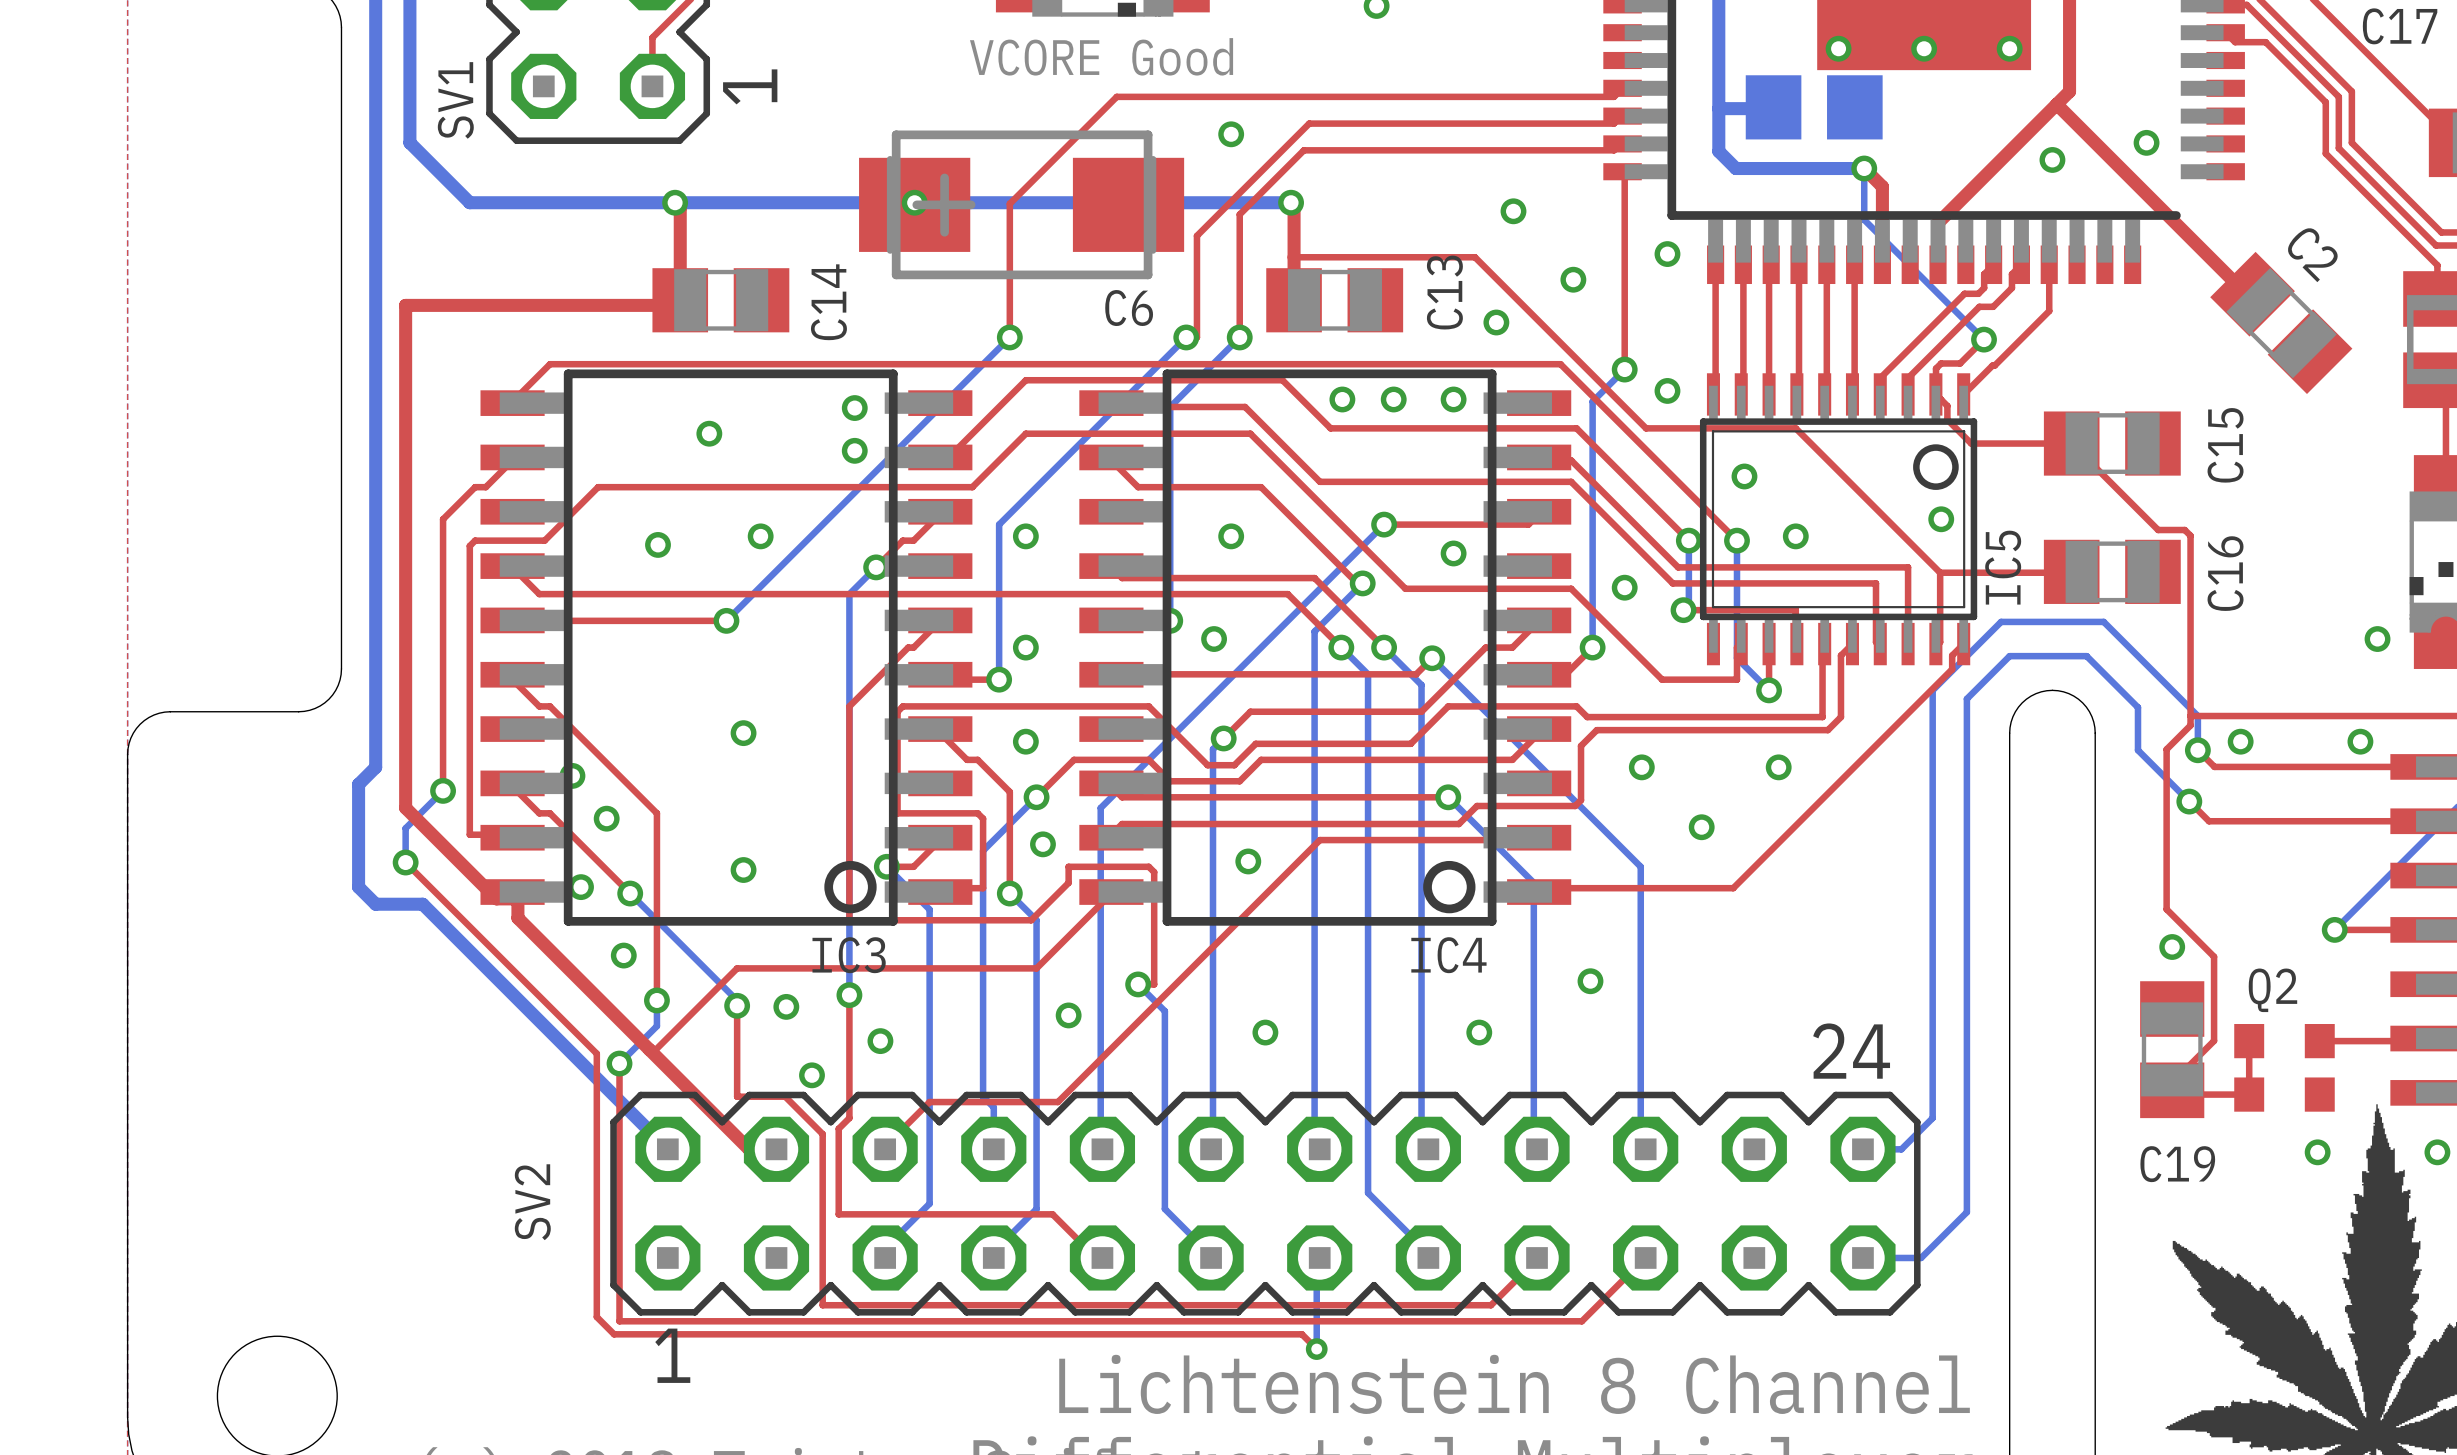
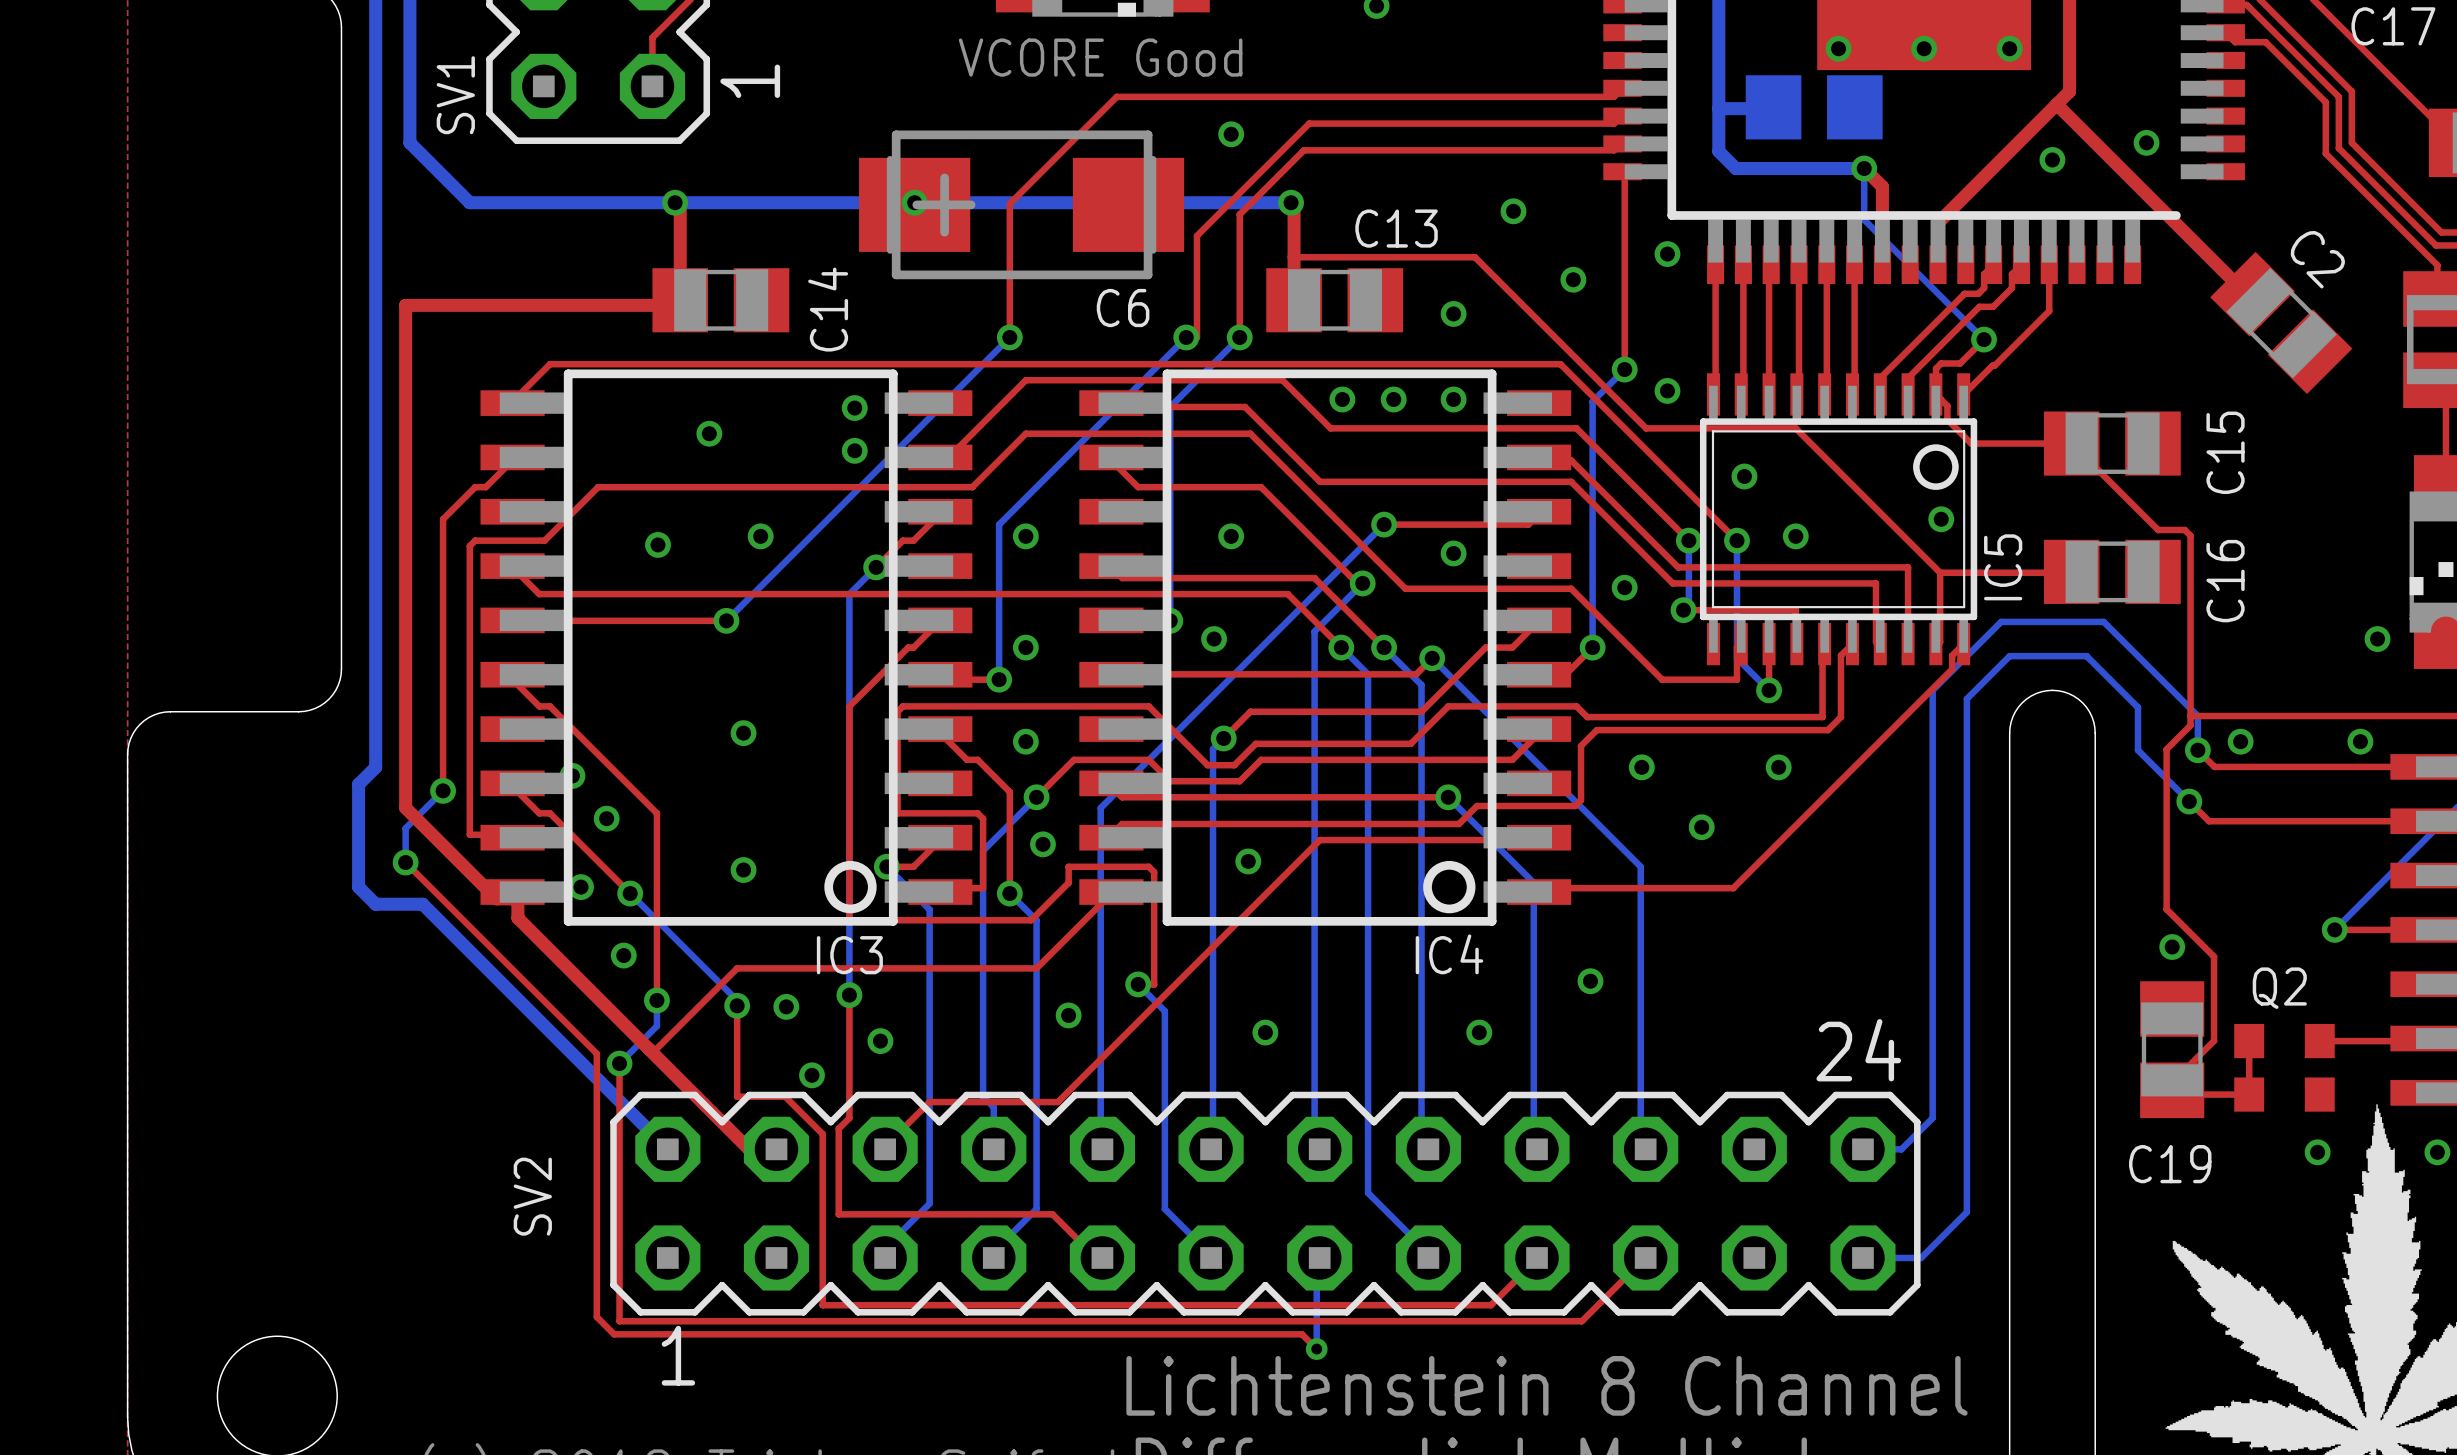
C13 name rotation: 0° (1444, 292) -> 90° clockwise (1396, 228)
via position: (1496, 322) -> (1453, 313)

